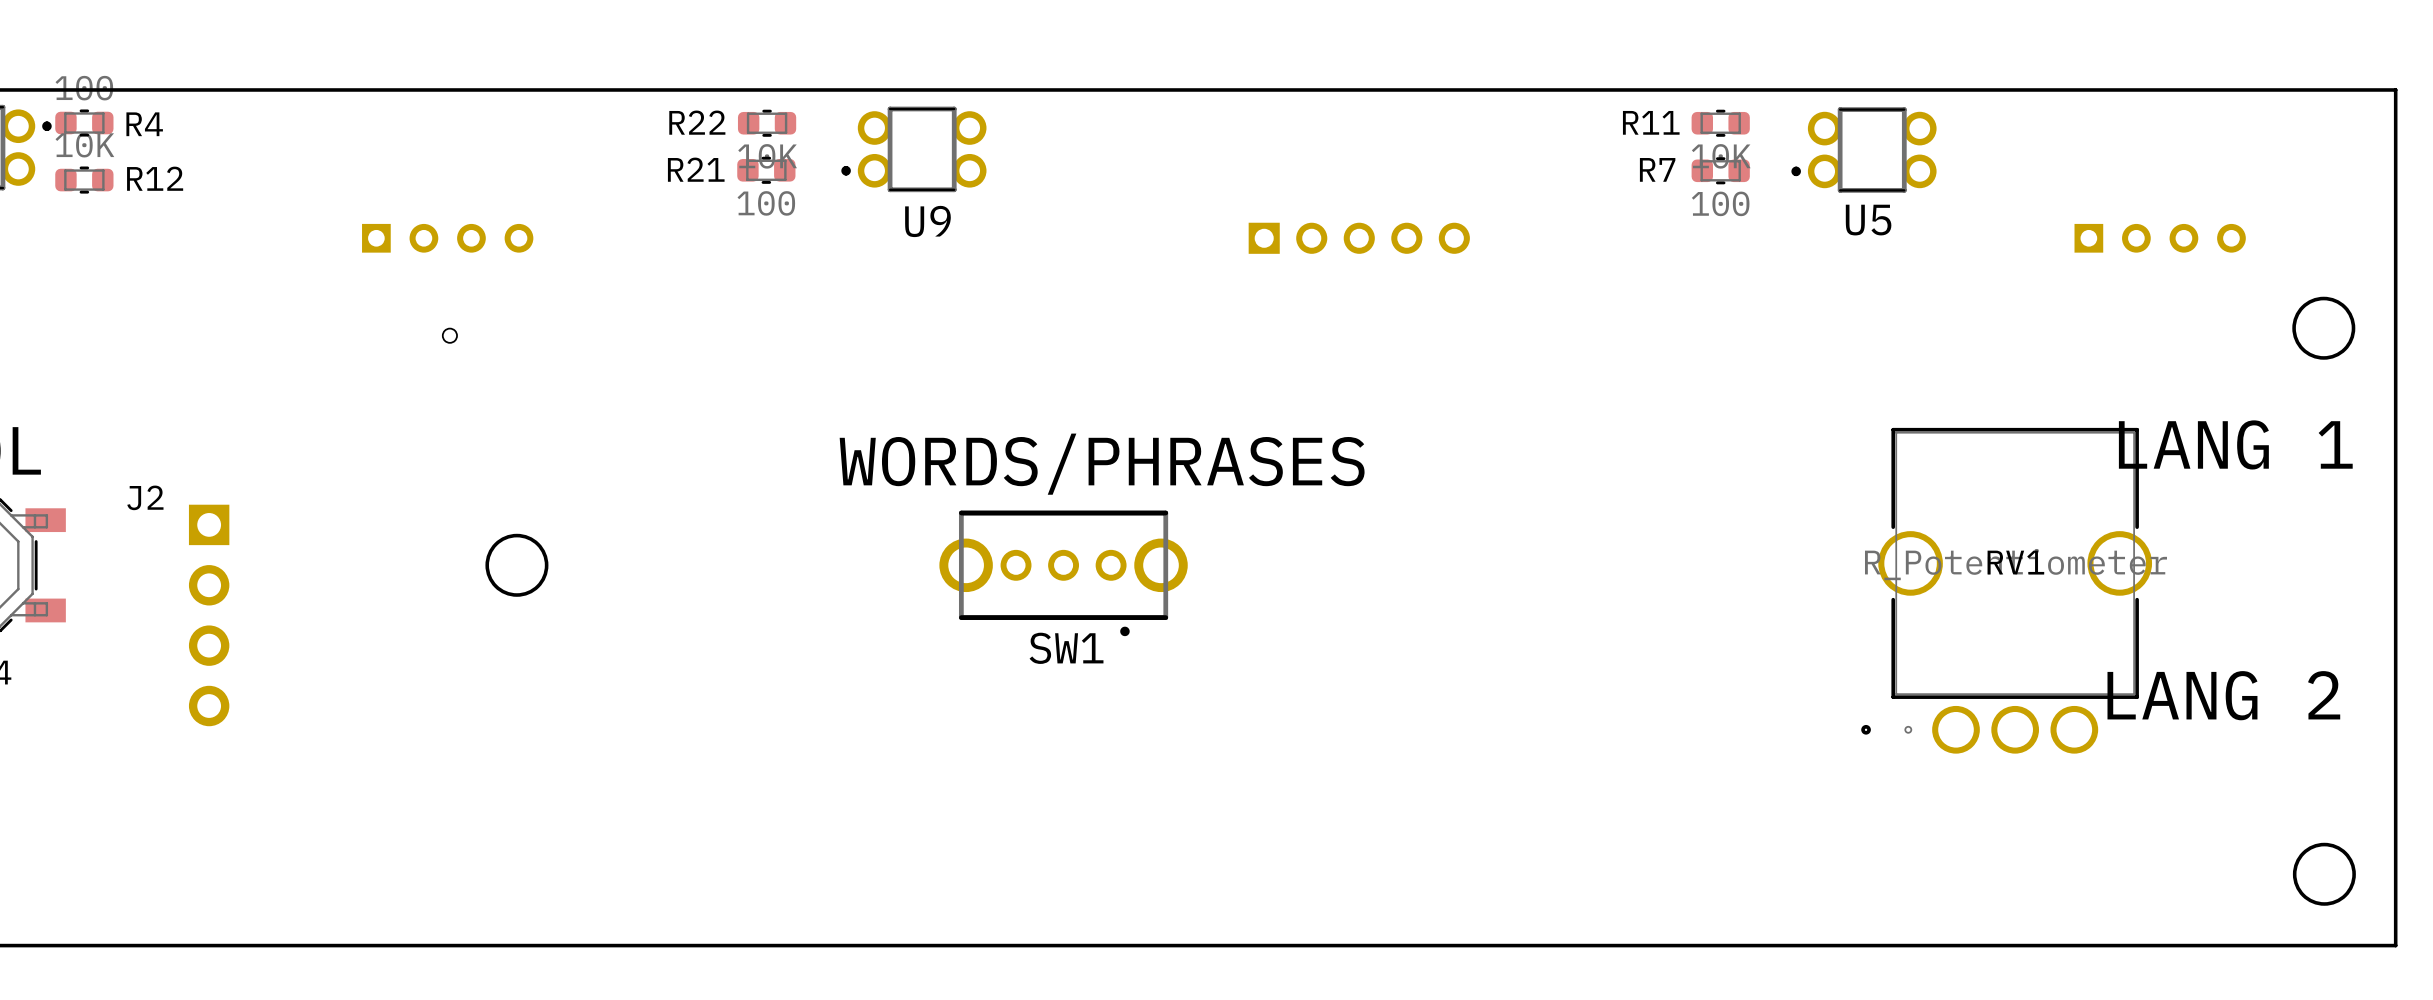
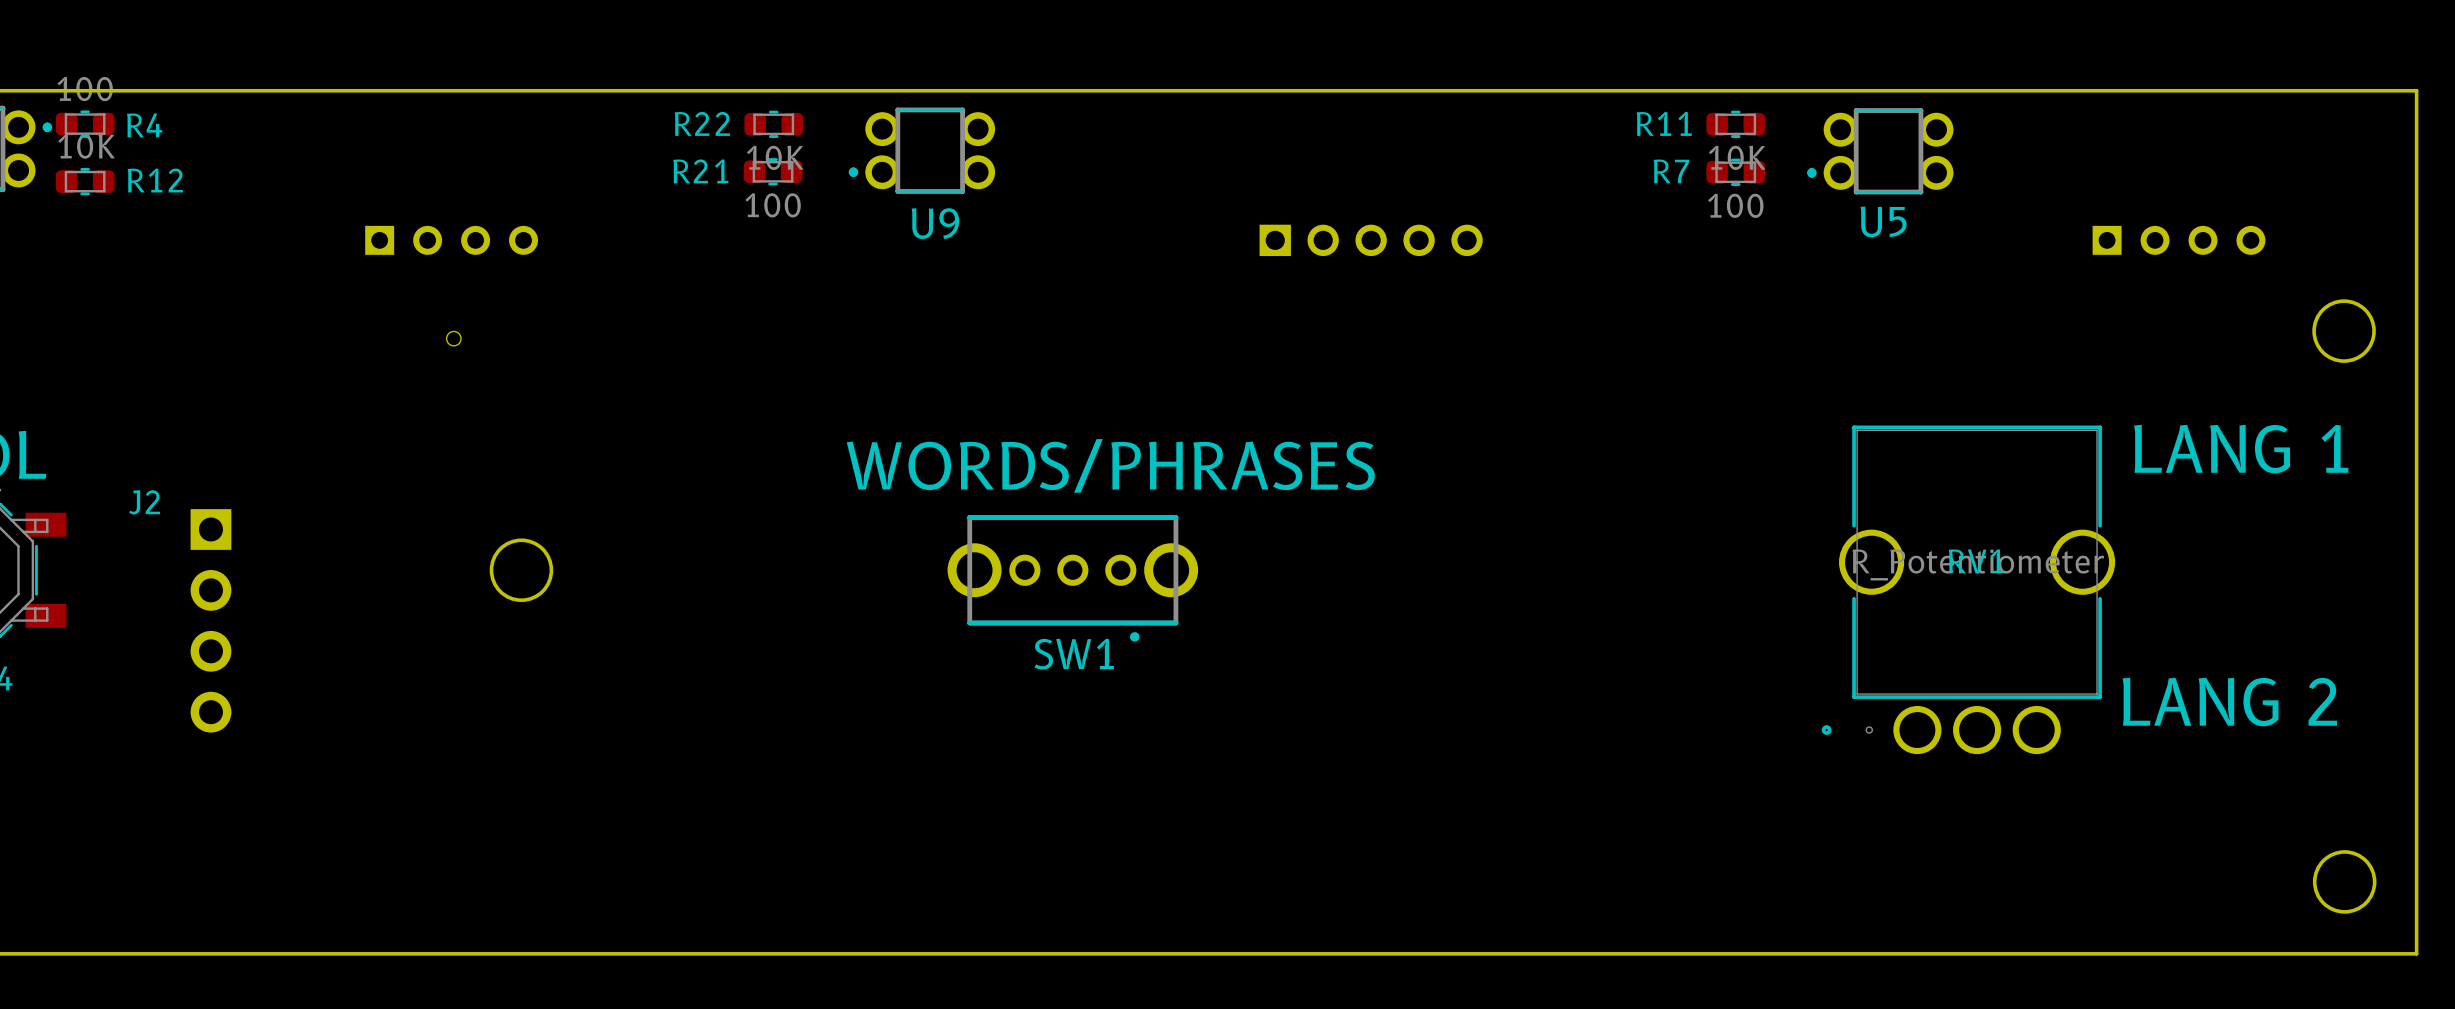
RV1 position: (2006, 590) -> (1968, 589)

